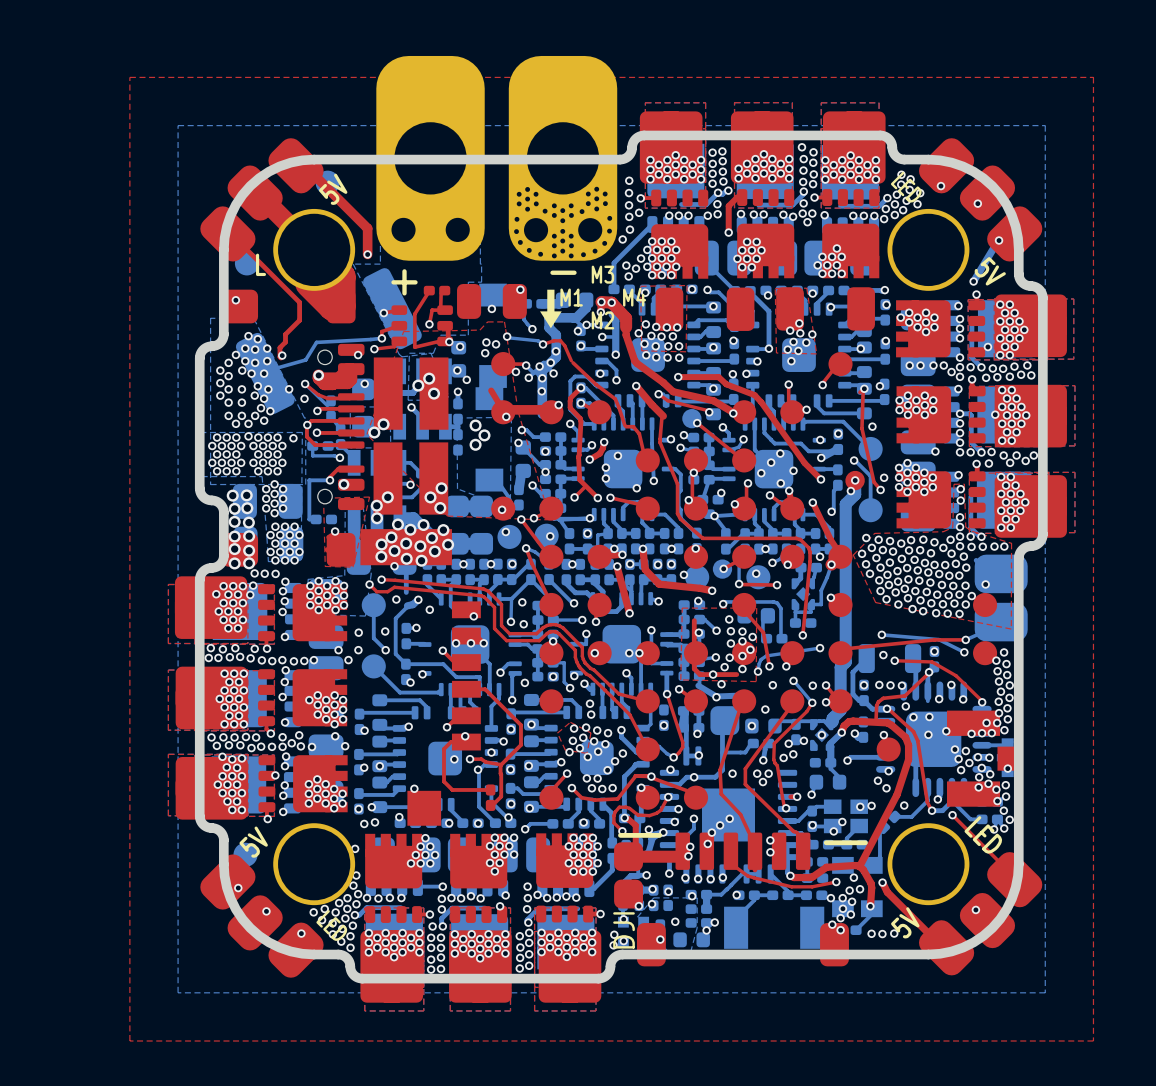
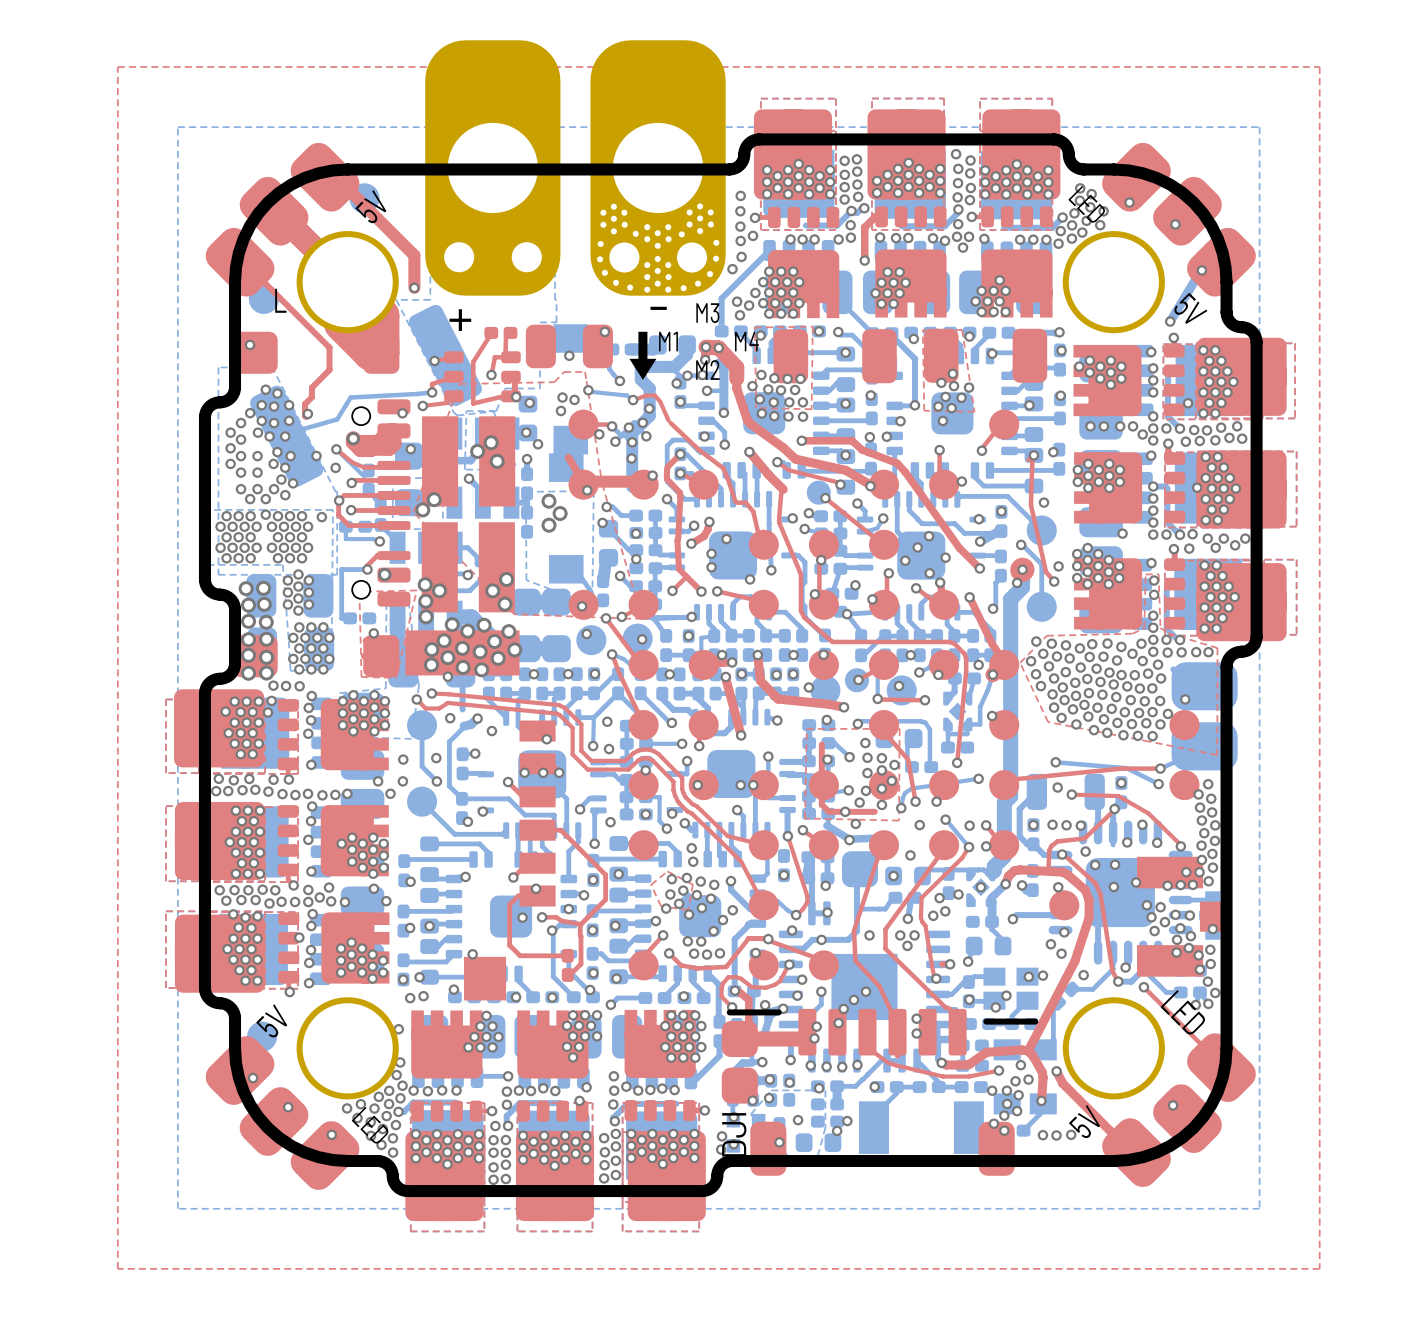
via: none -> (425, 584)

